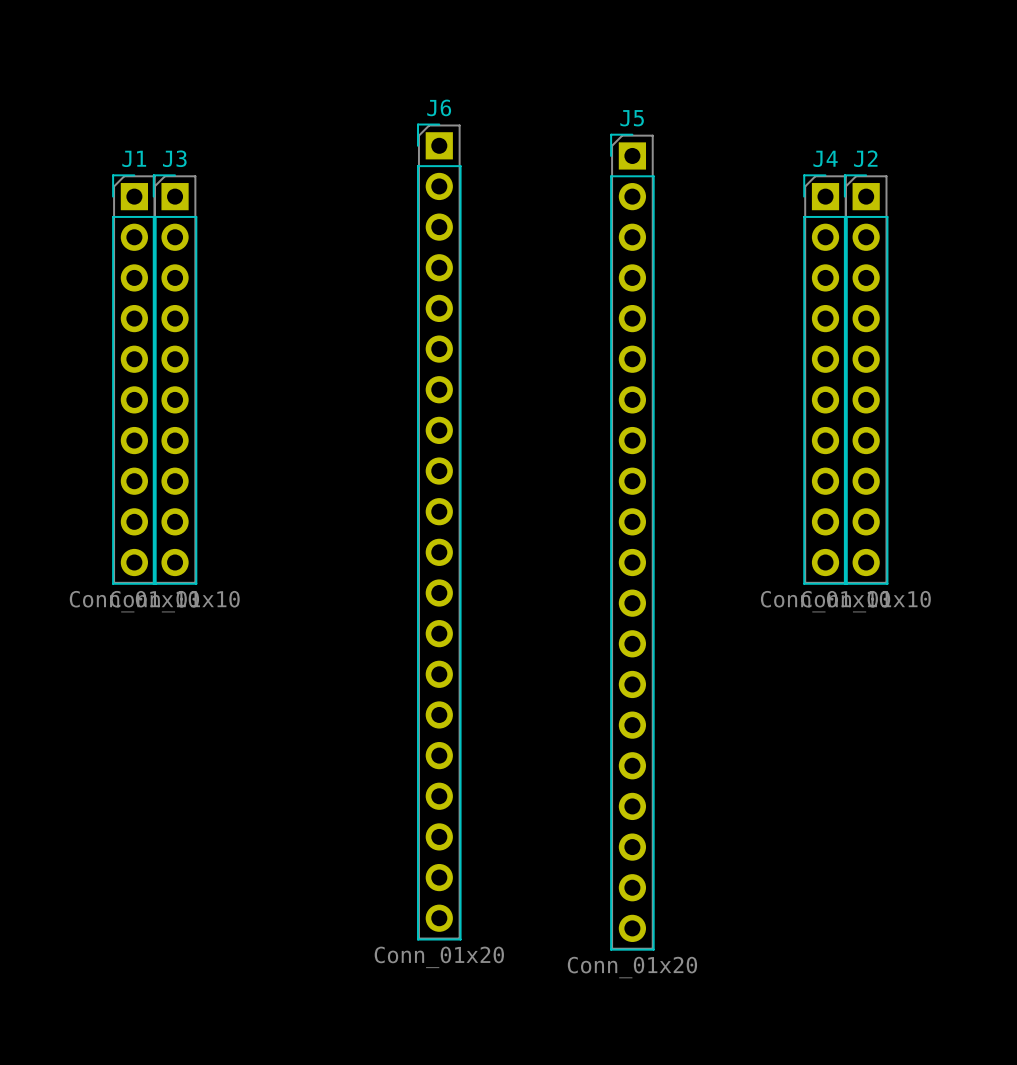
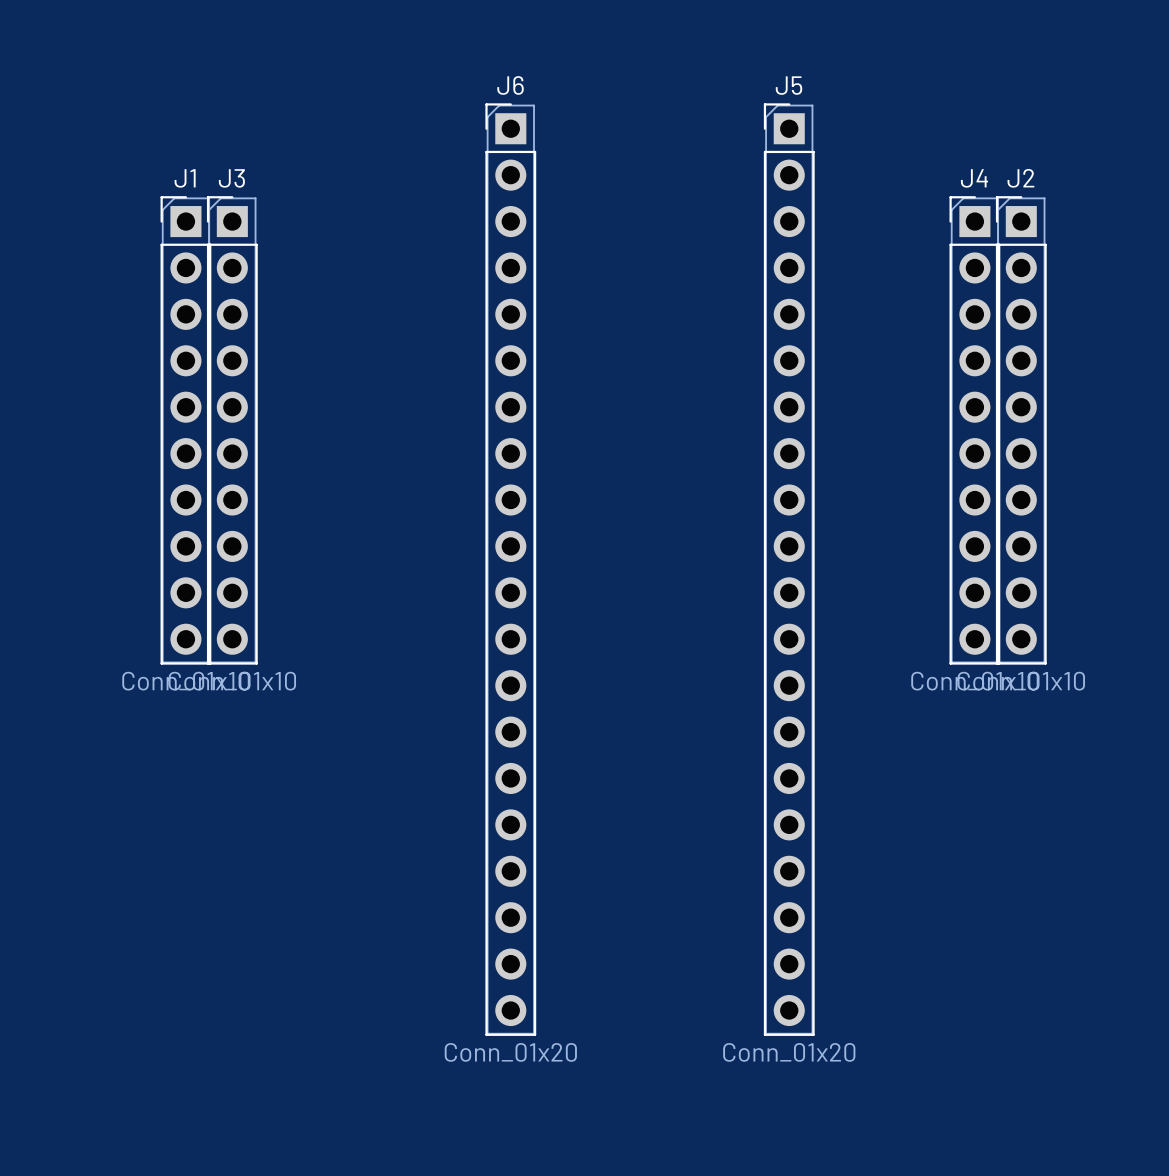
J6 position: (439, 532) -> (510, 569)
J5 position: (632, 542) -> (789, 569)

